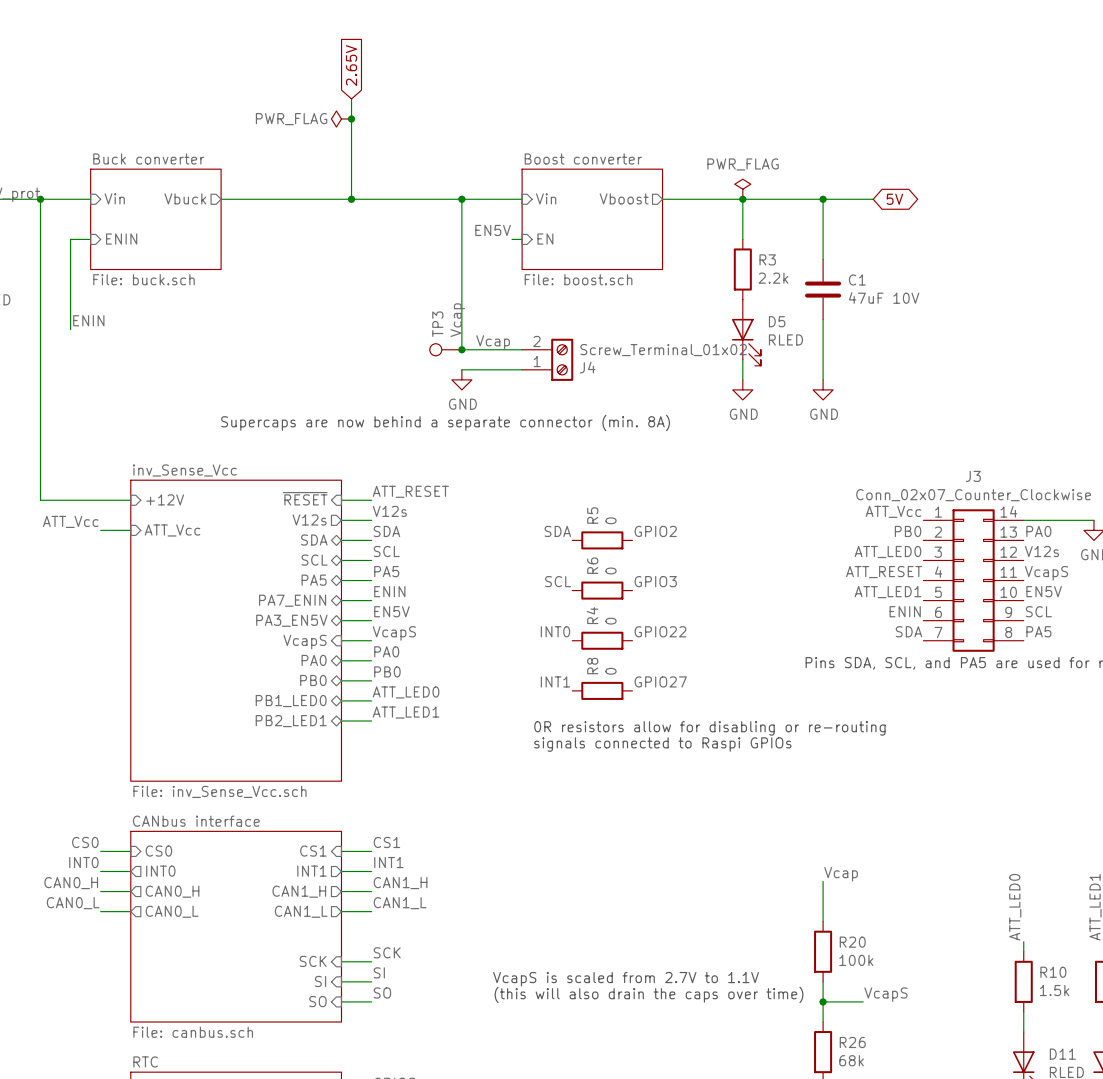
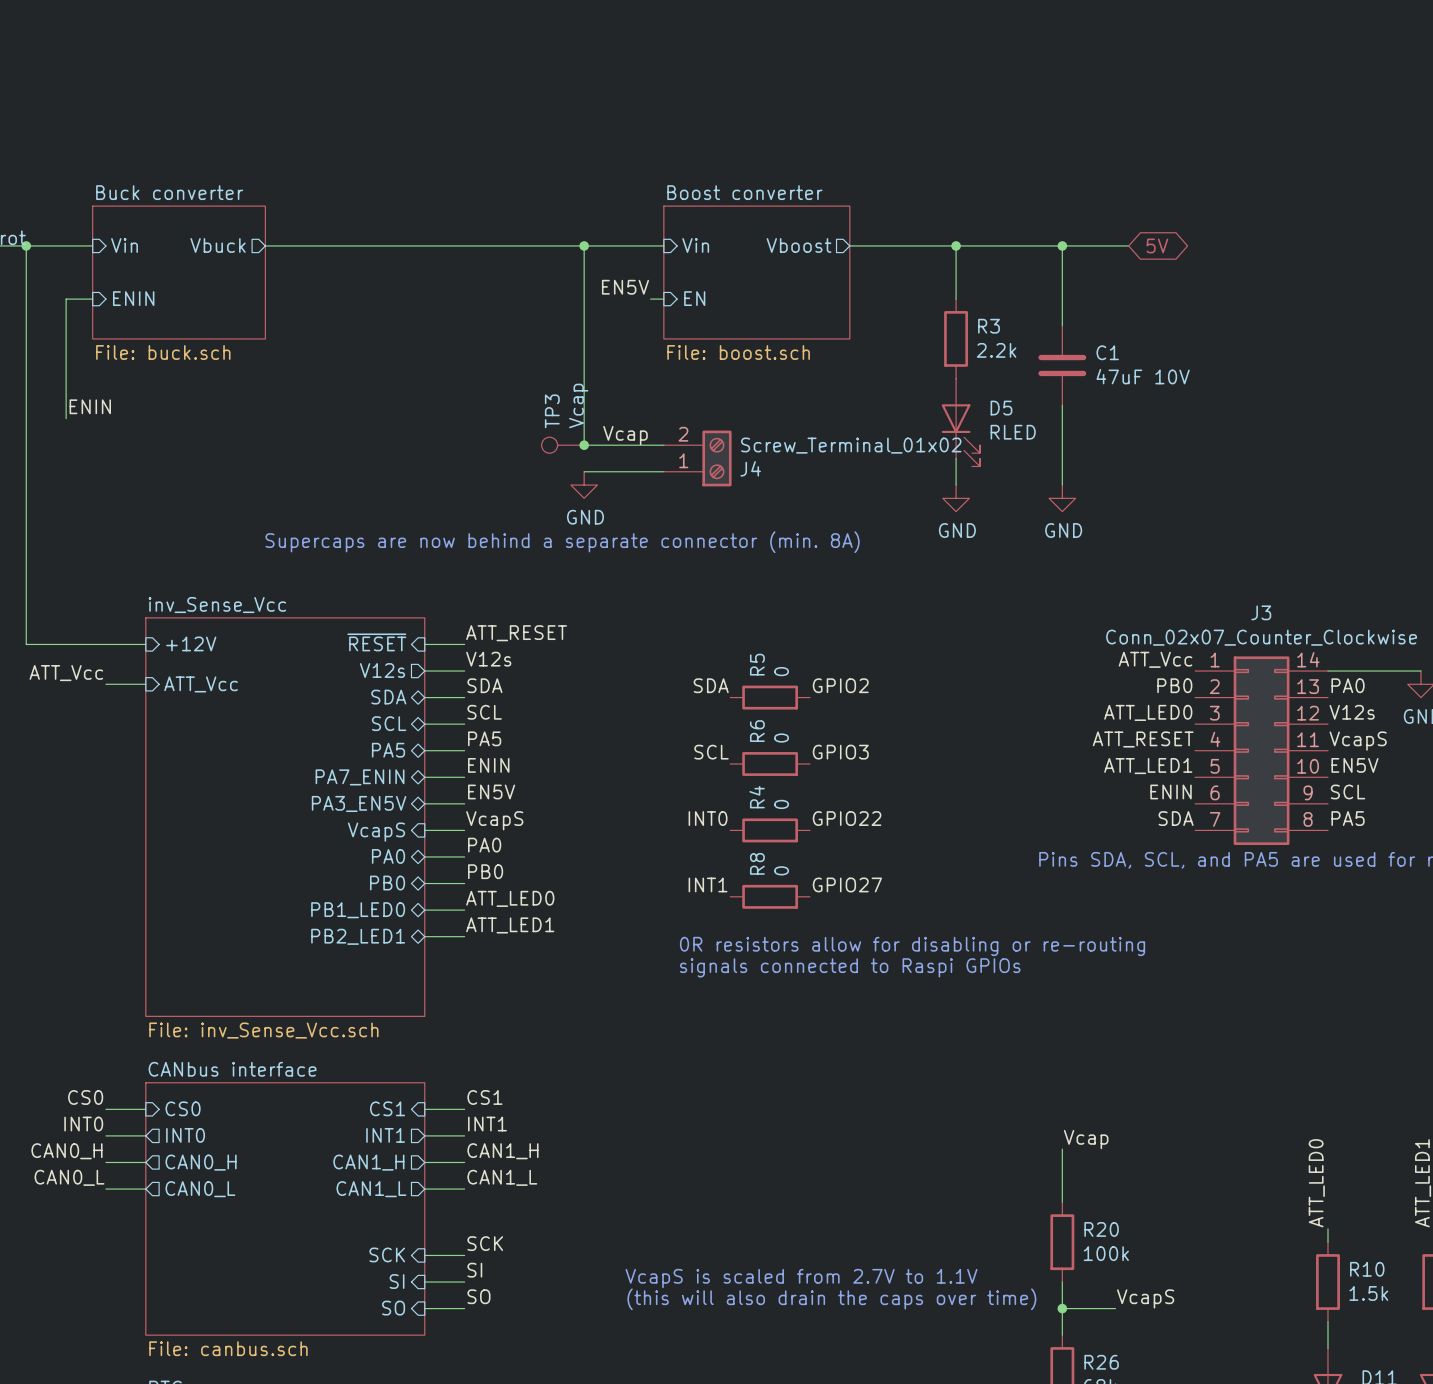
global label: 2.65V (351, 65) -> none
wire: (351, 98) (351, 199) -> none
power symbol: PWR_FLAG (341, 119) -> none
junction: (351, 119) -> none
power symbol: PWR_FLAG (742, 189) -> none
junction: (351, 199) -> none

